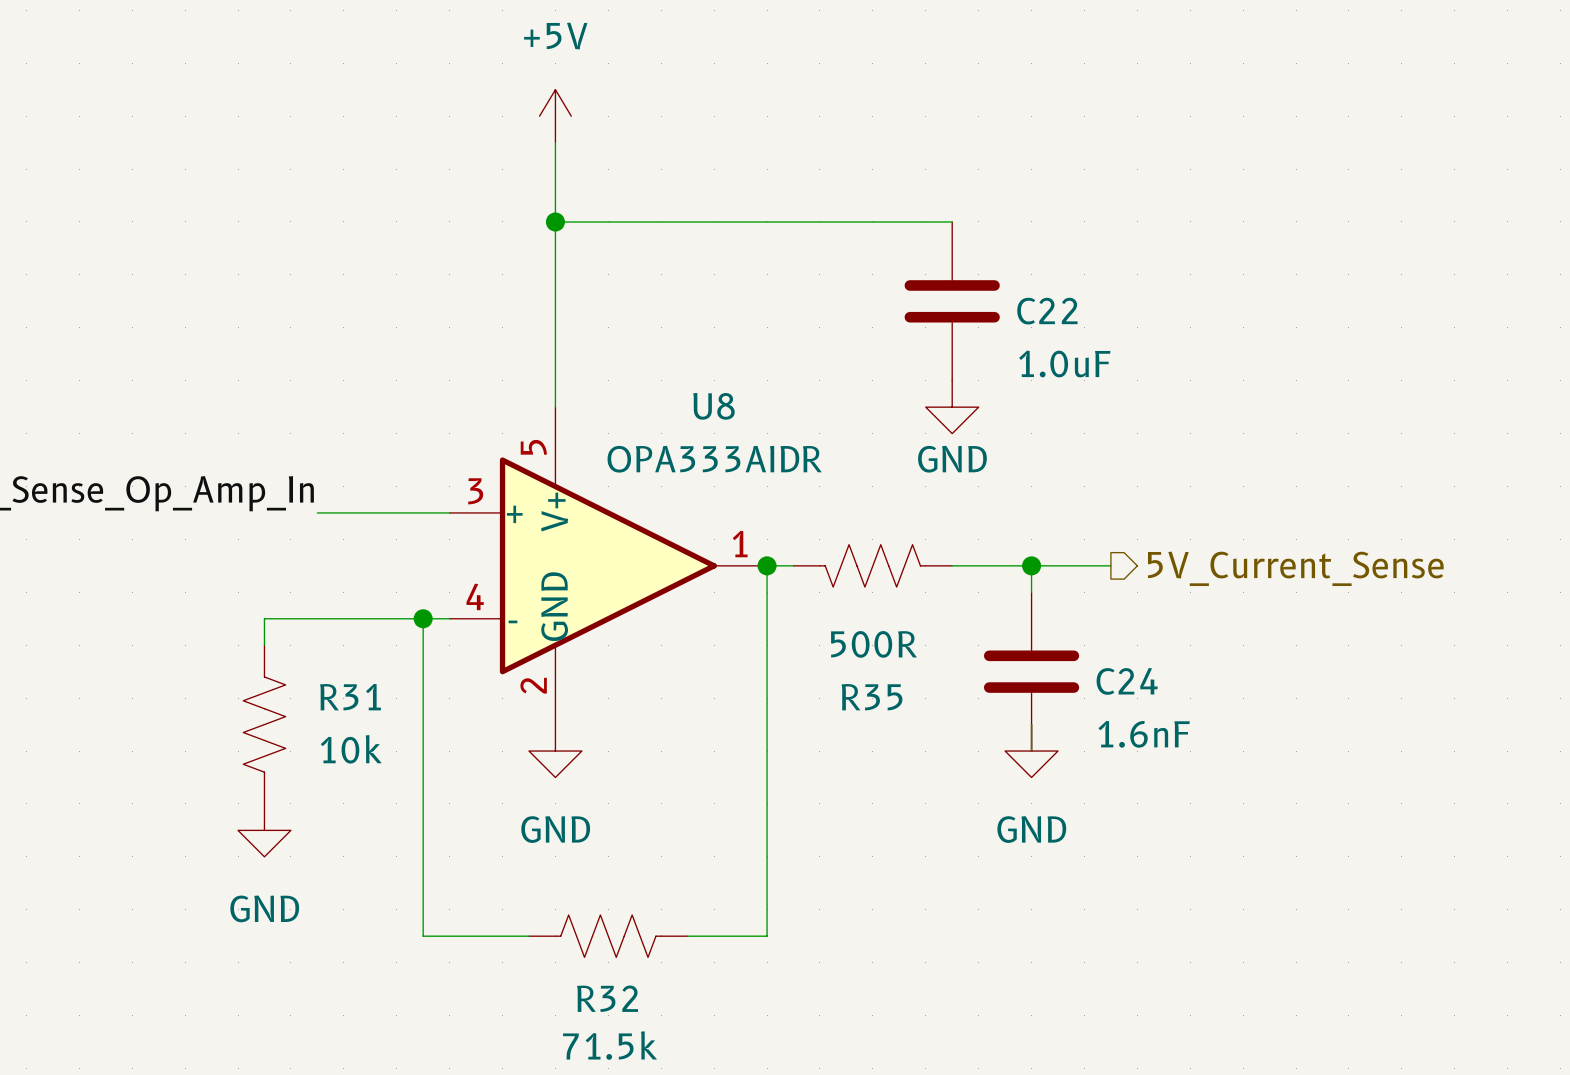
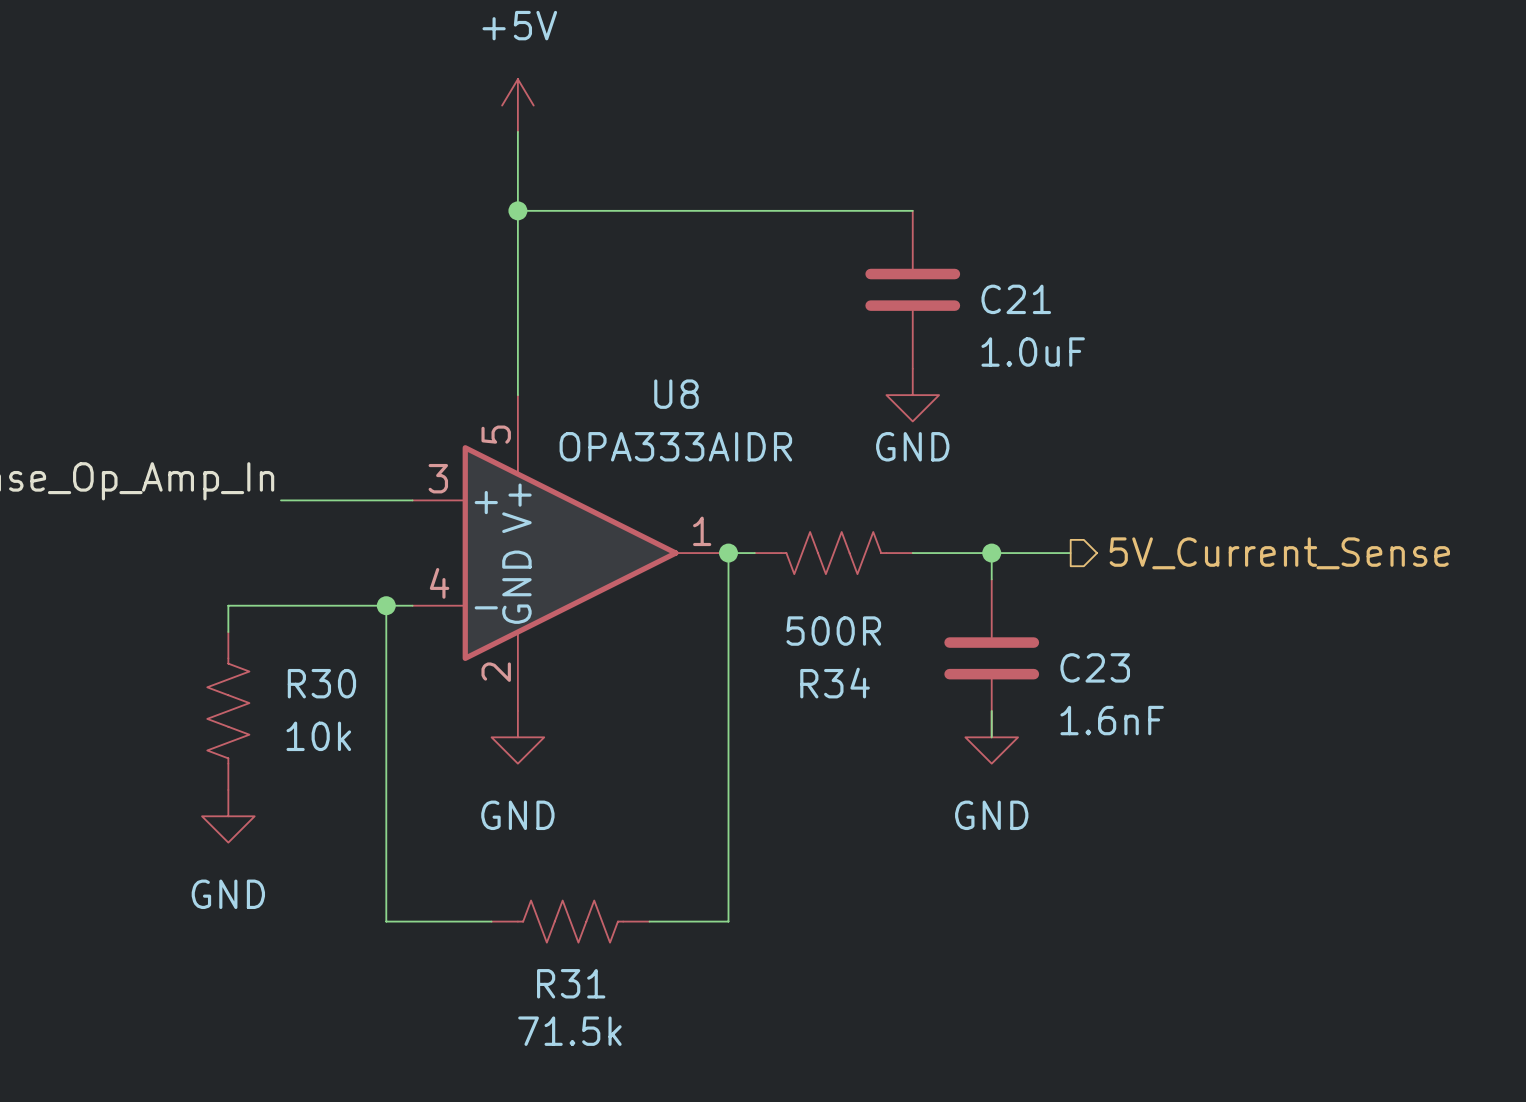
C22 name: C22 (1047, 311) -> C21 (1016, 299)
C24 name: C24 (1127, 681) -> C23 (1095, 667)
R31 name: R31 (350, 697) -> R30 (321, 683)
R35 name: R35 (872, 697) -> R34 (835, 683)
R32 name: R32 (607, 998) -> R31 (571, 983)

